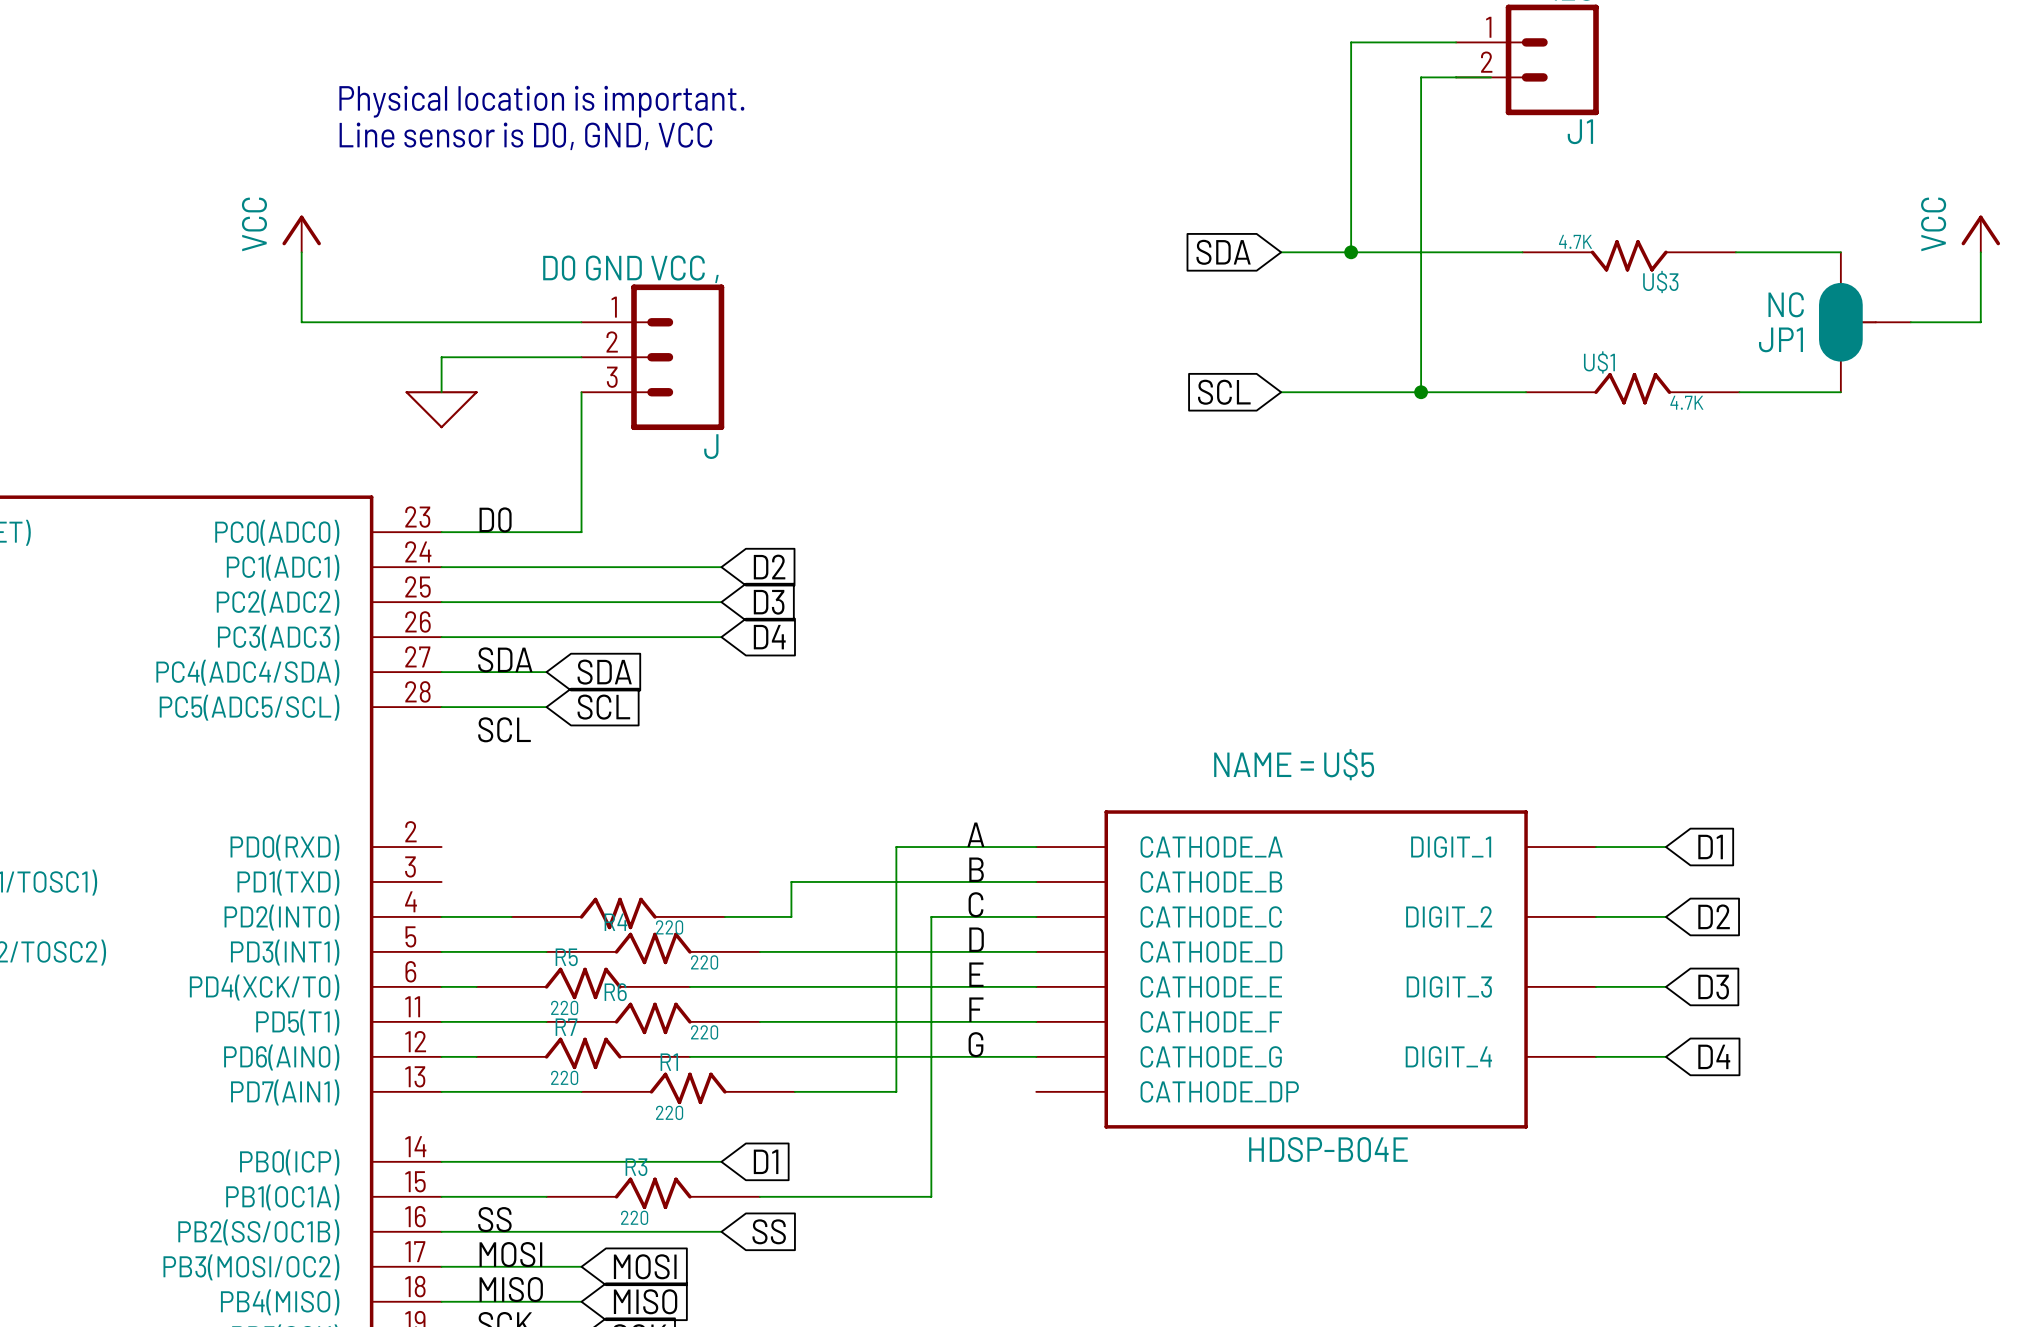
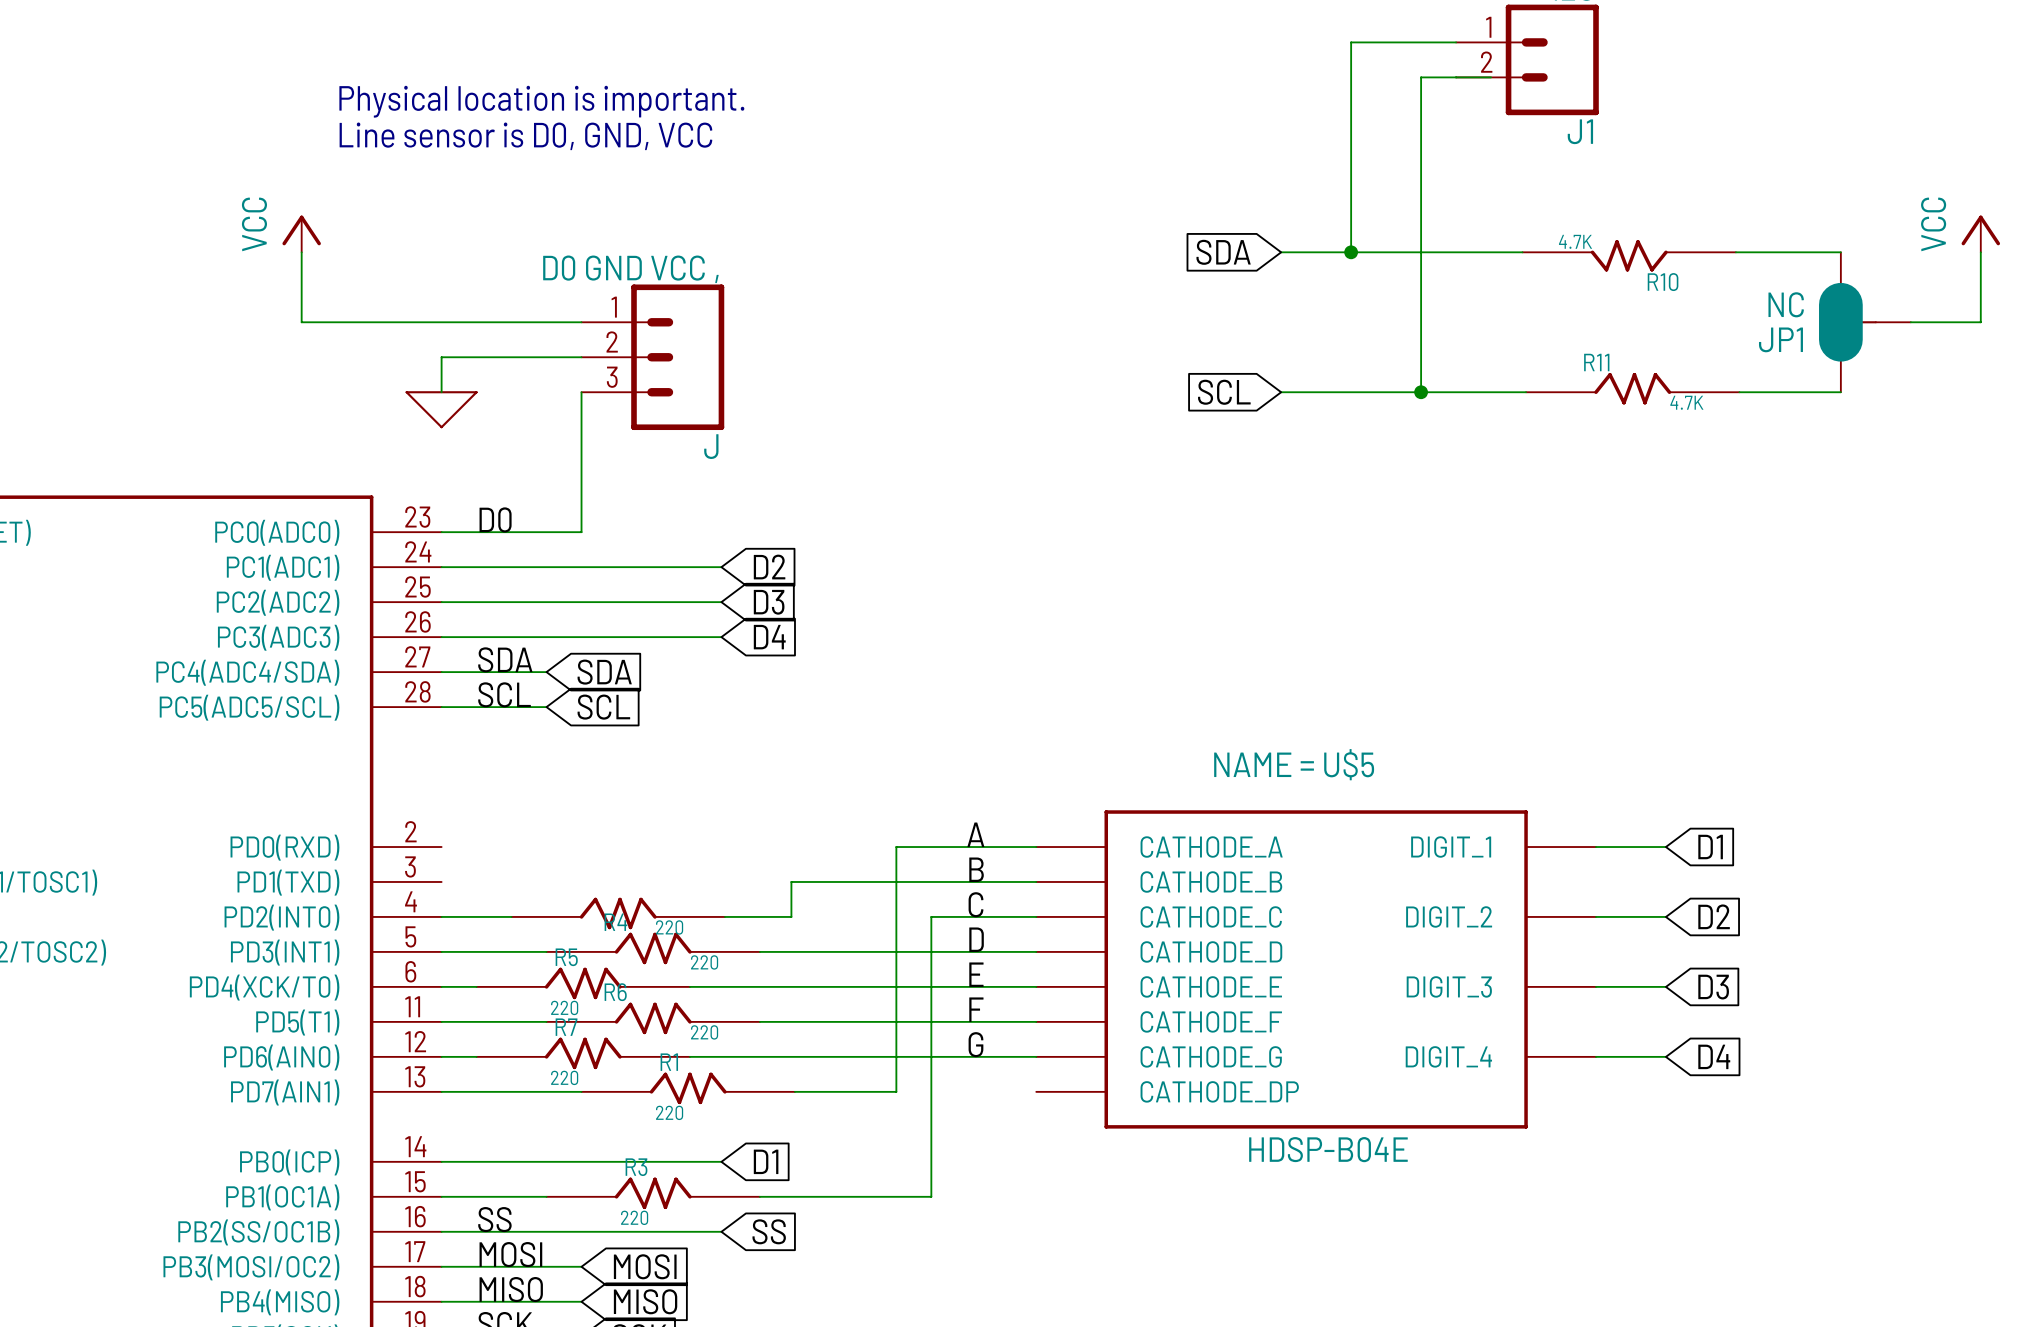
U$3 name: U$3 (1660, 281) -> R10 (1663, 282)
U$1 name: U$1 (1599, 362) -> R11 (1596, 362)
label position: SCL (504, 729) -> SCL (504, 694)

